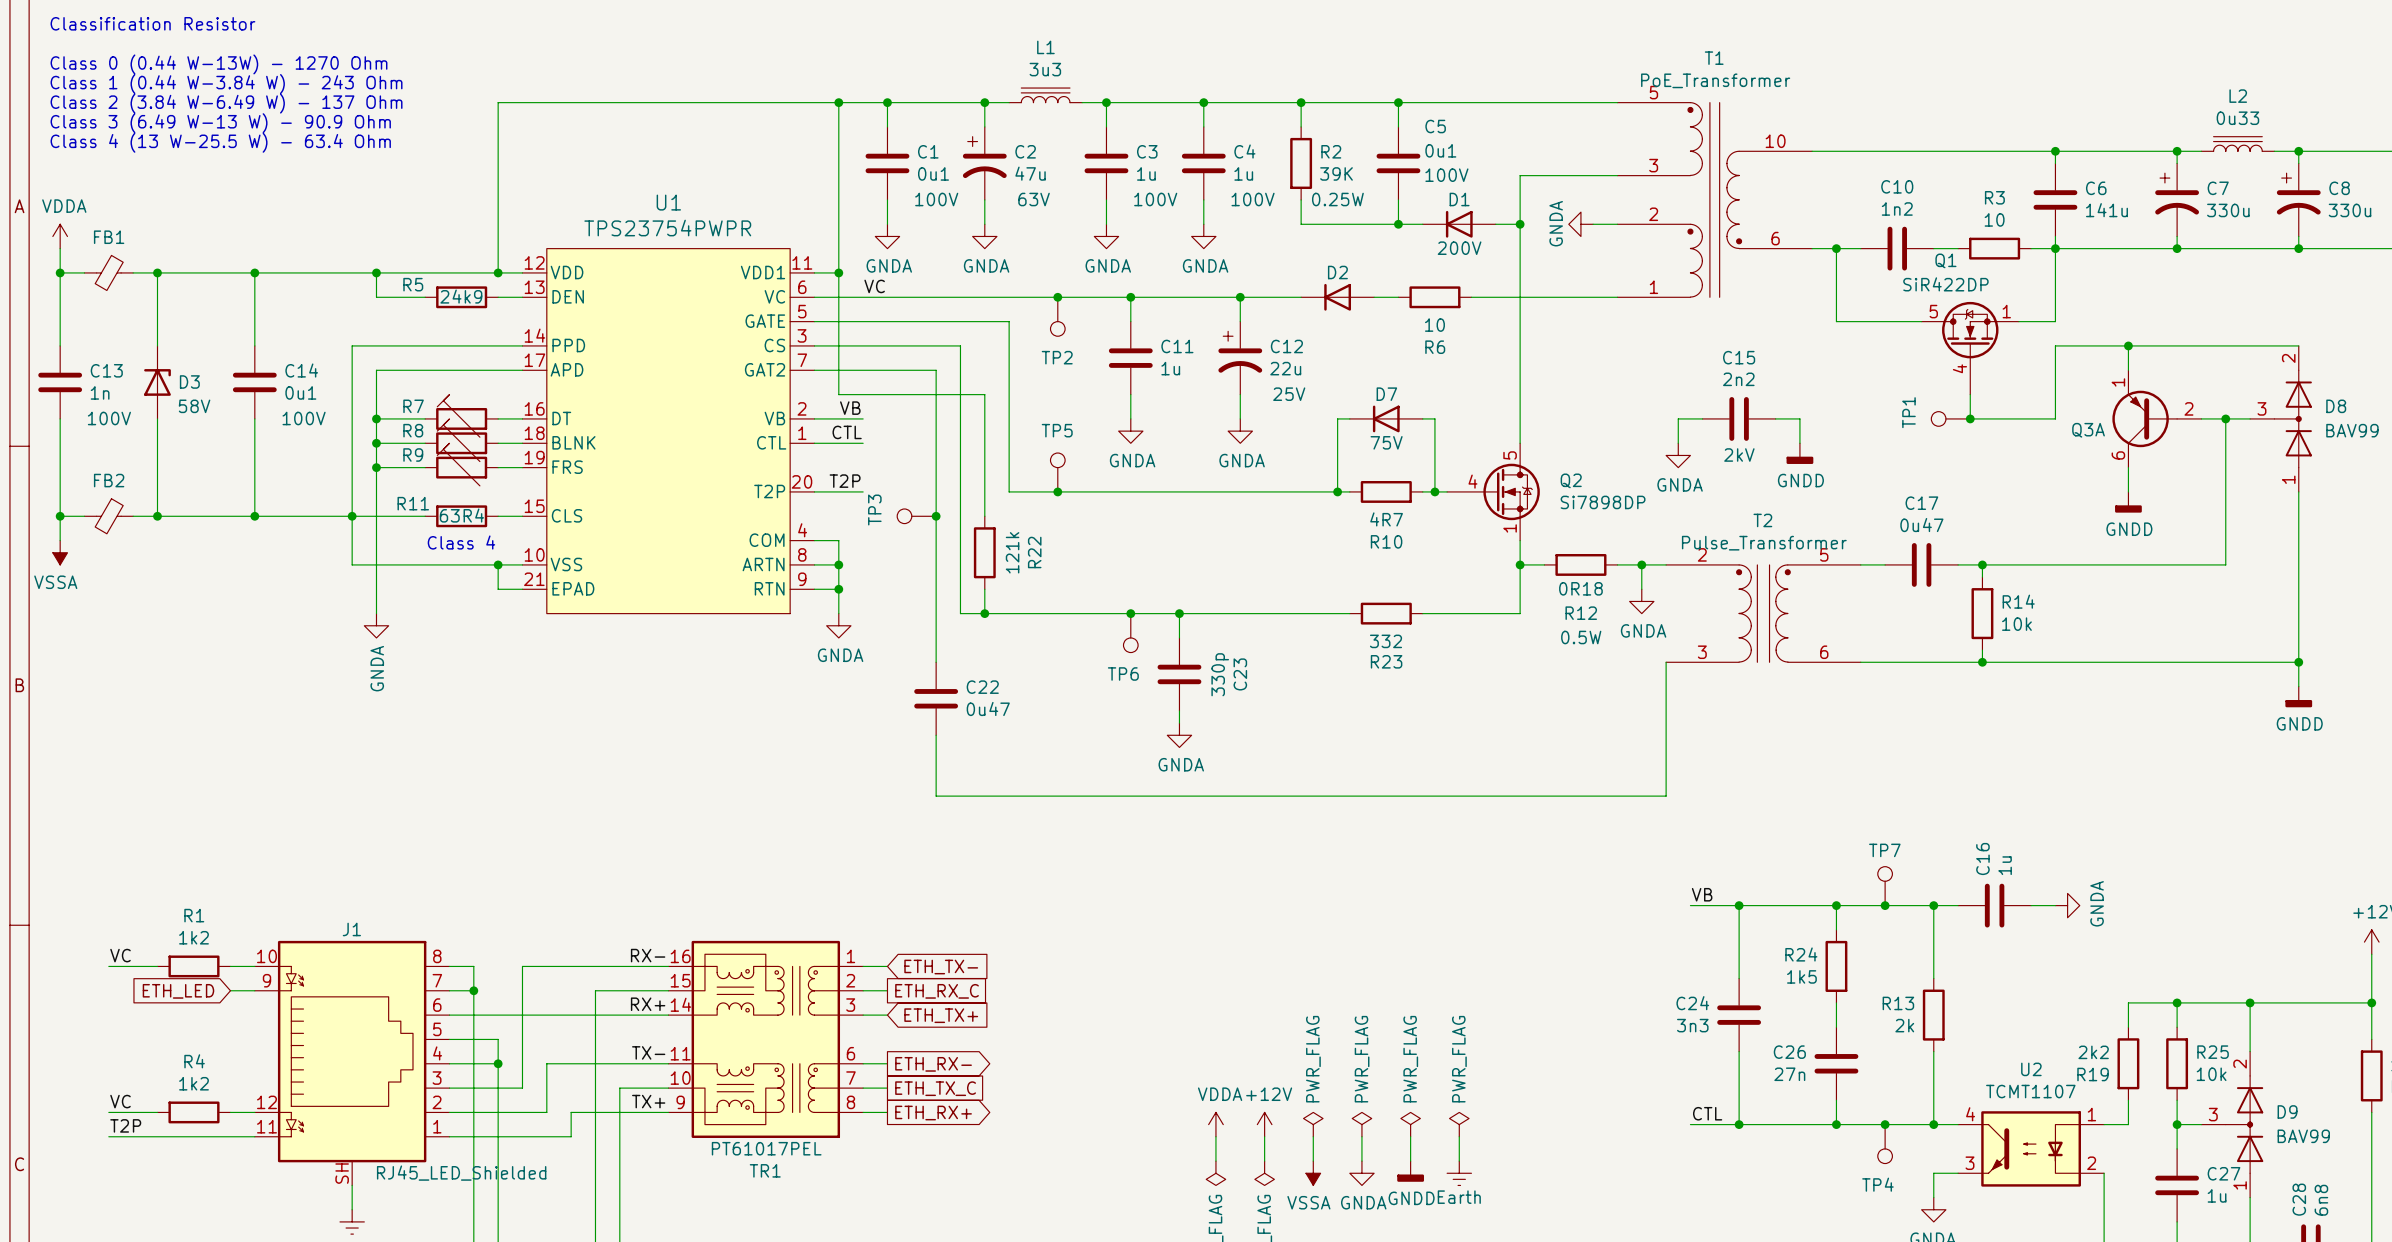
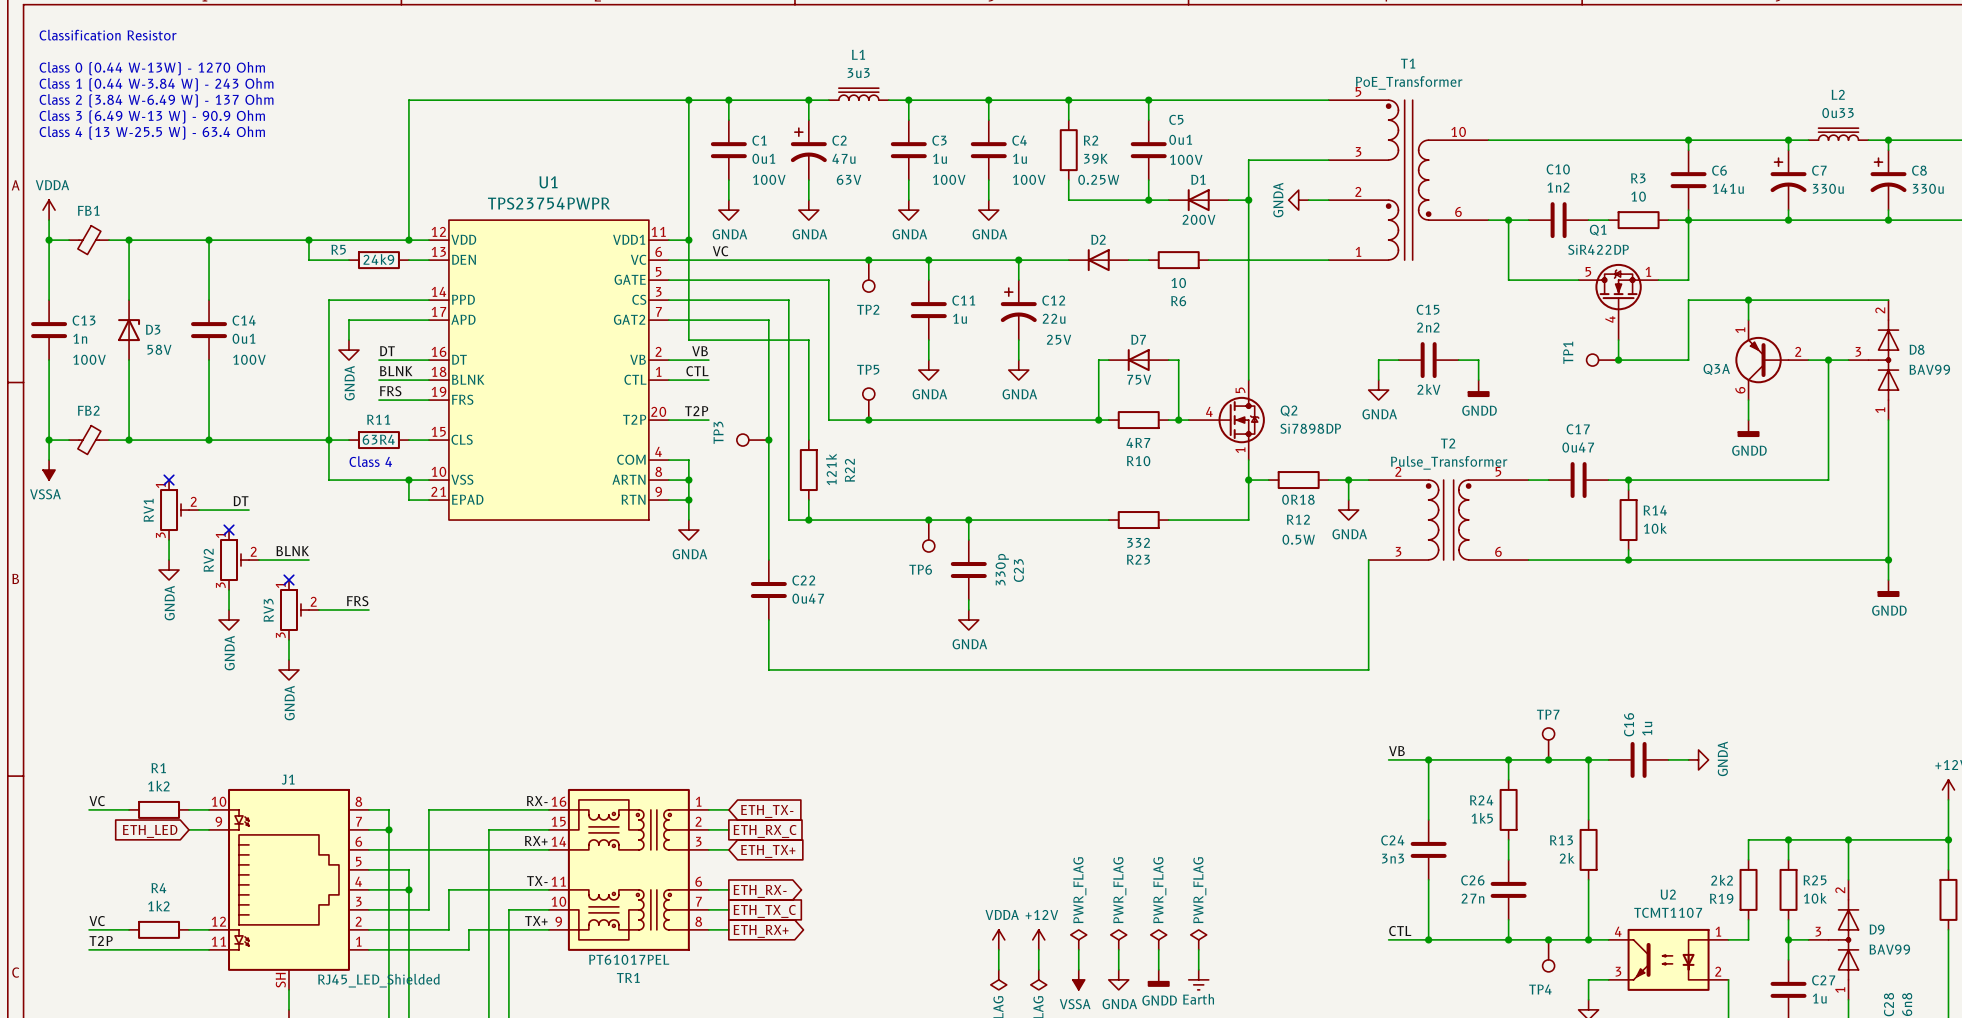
wire: (400, 345) (352, 345) (352, 564) (400, 564) -> (328, 300) (328, 480)
wire: (425, 370) (376, 370) (376, 613) -> (348, 320) (348, 340)
power symbol: none -> GNDA (348, 350)
label: none -> DT (387, 351)
R7: (461, 415) -> none
wire: (376, 418) (425, 418) -> none
junction: (376, 418) -> none
wire: none -> (378, 360) (408, 360)
label: none -> BLNK (396, 371)
R8: (461, 440) -> none
wire: (376, 443) (425, 443) -> none
junction: (376, 443) -> none
wire: none -> (378, 380) (408, 380)
label: none -> FRS (390, 391)
R9: (461, 464) -> none
wire: (376, 467) (425, 467) -> none
junction: (376, 467) -> none
wire: none -> (378, 400) (408, 400)
R11 name position: R11 (413, 503) -> R11 (378, 419)
junction: (352, 516) -> none
junction: none -> (328, 440)
no-connect mark: none -> (169, 480)
label: none -> DT (241, 501)
RV1: none -> (179, 510)
wire: none -> (199, 510) (249, 510)
no-connect mark: none -> (229, 530)
power symbol: GNDA (376, 625) -> none
wire: none -> (169, 540) (169, 560)
label: none -> BLNK (292, 551)
RV2: none -> (239, 560)
wire: none -> (259, 560) (308, 560)
power symbol: none -> GNDA (169, 570)
no-connect mark: none -> (288, 580)
wire: none -> (229, 590) (229, 610)
label: none -> FRS (357, 601)
RV3: none -> (299, 610)
wire: none -> (318, 610) (368, 610)
power symbol: none -> GNDA (229, 619)
wire: none -> (288, 639) (288, 659)
power symbol: none -> GNDA (288, 669)

